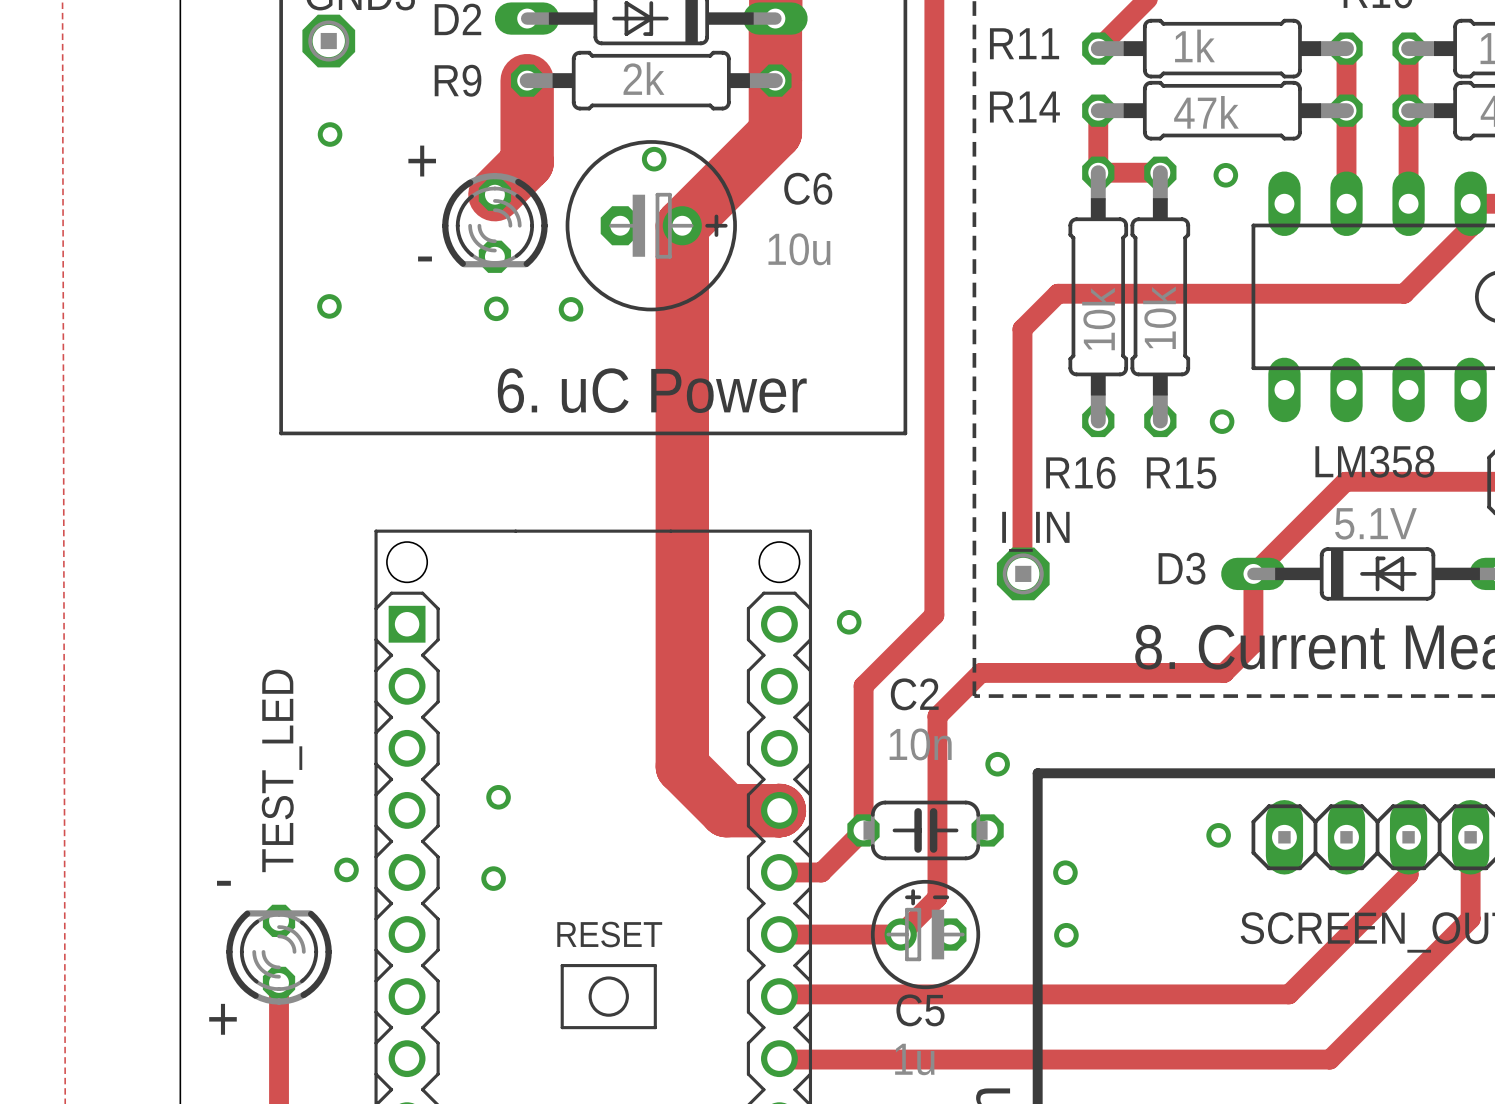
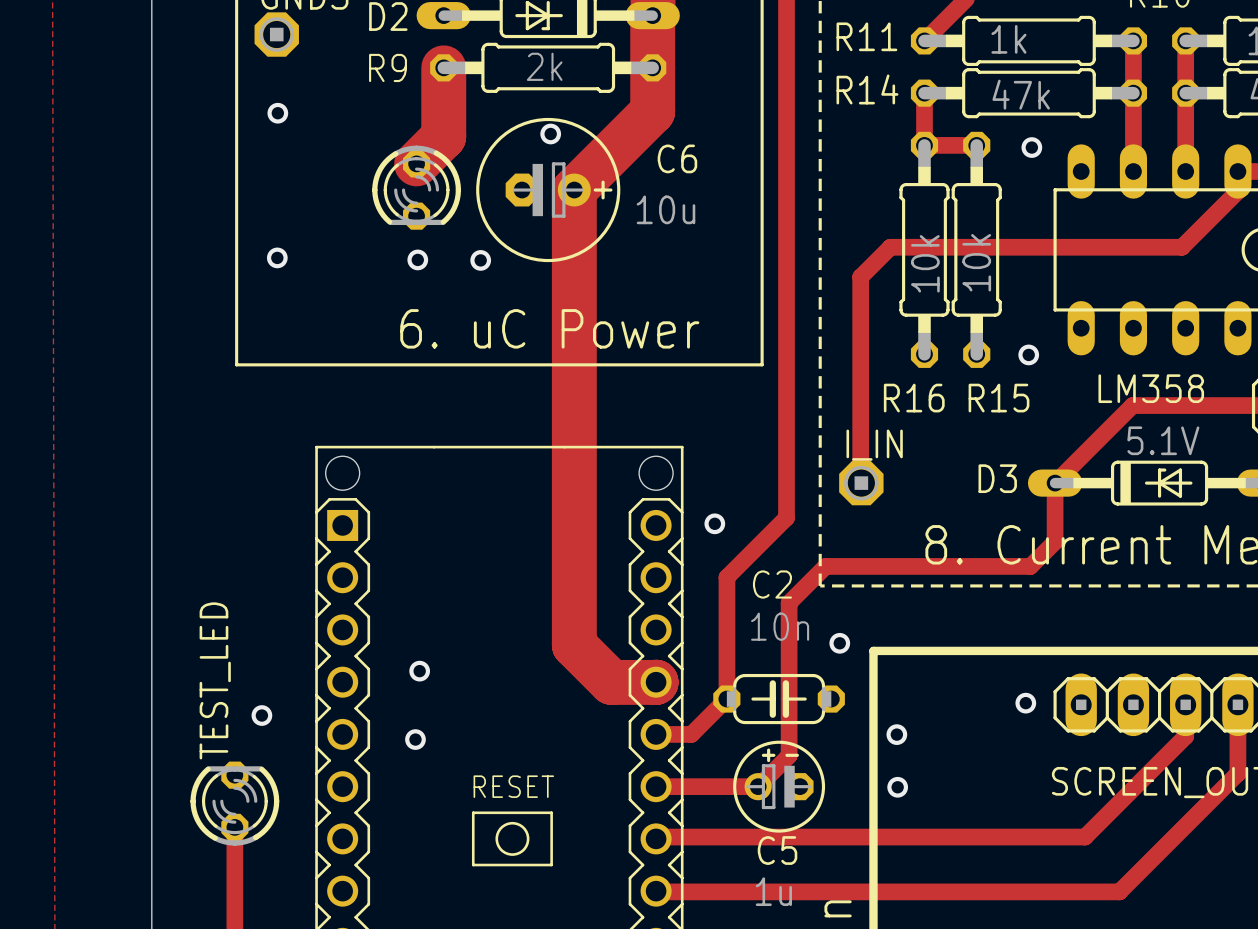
text: + (422, 161) -> none
text: - (425, 258) -> none
TEST_LED name position: TEST_LED (282, 770) -> TEST_LED (215, 680)
via position: (346, 869) -> (261, 715)
text: - (223, 883) -> none
text: + (222, 1019) -> none

